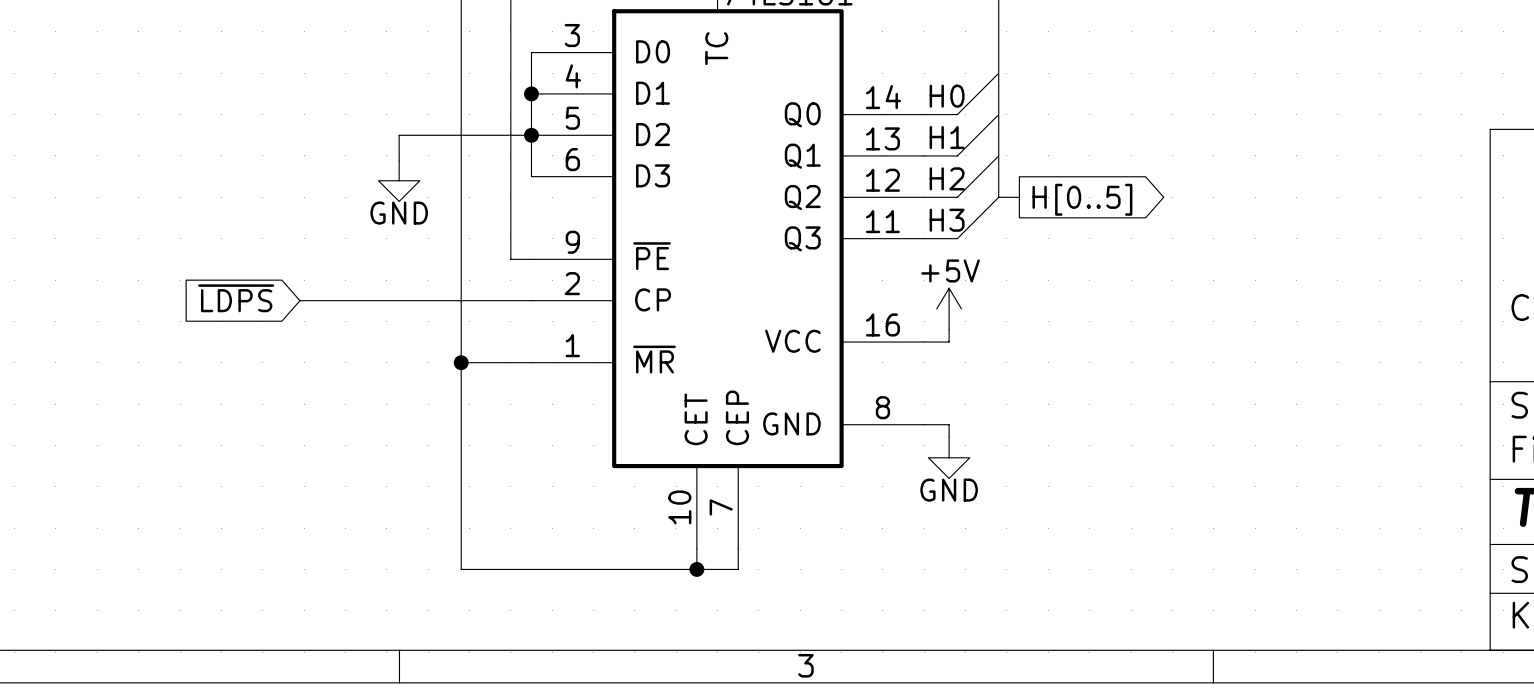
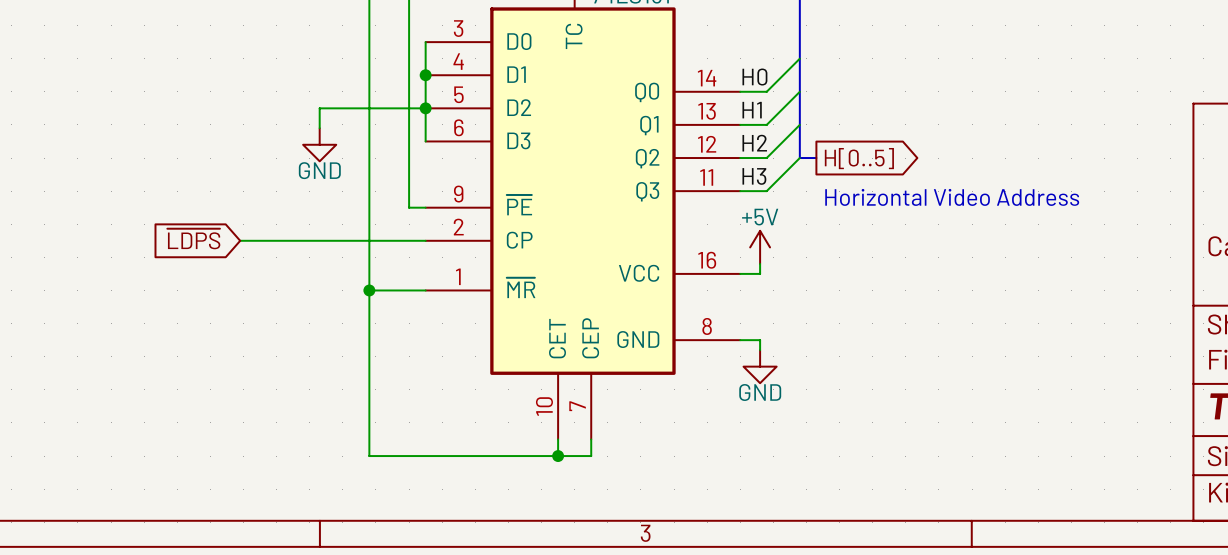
text: none -> Horizontal Video Address (952, 197)

